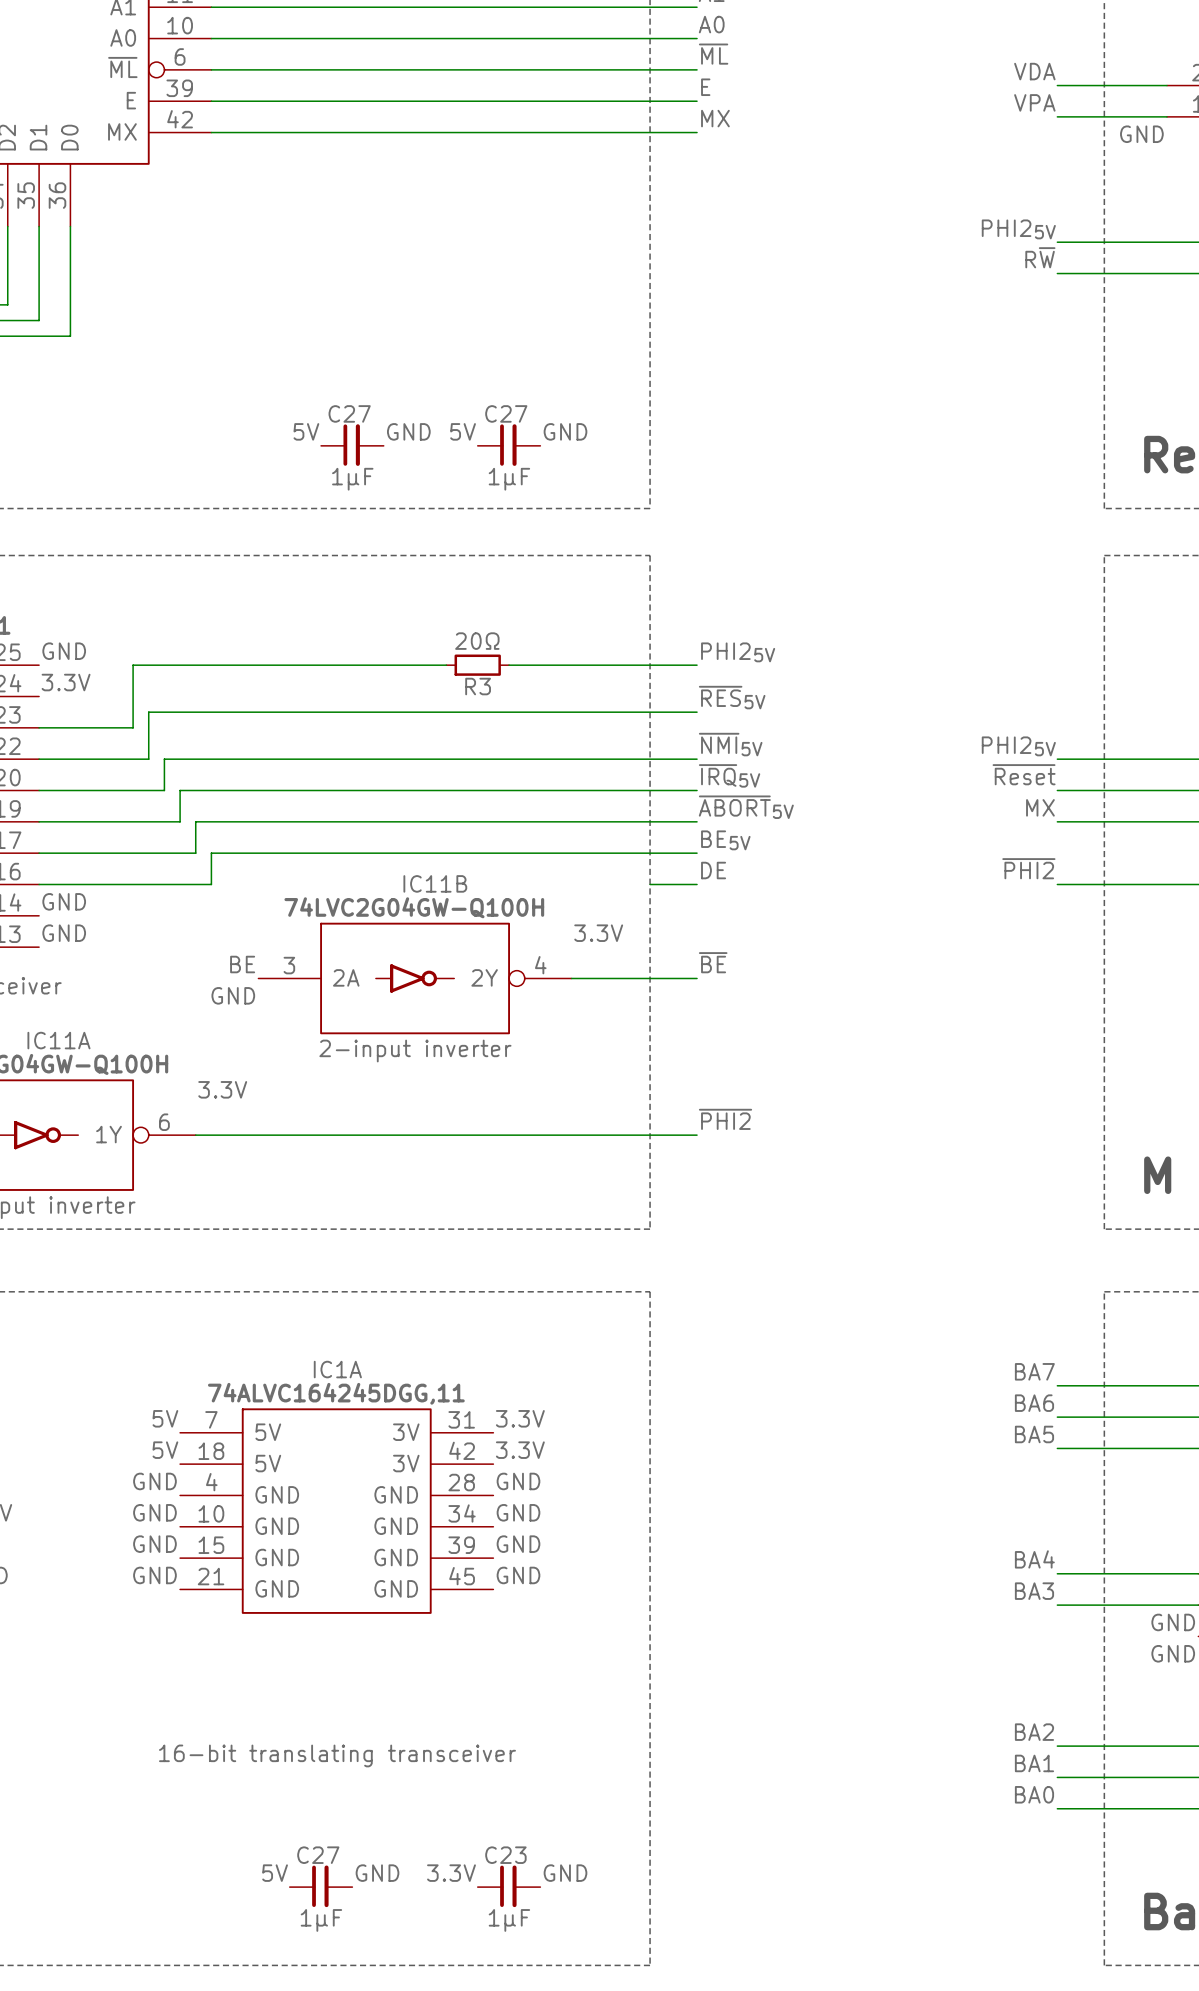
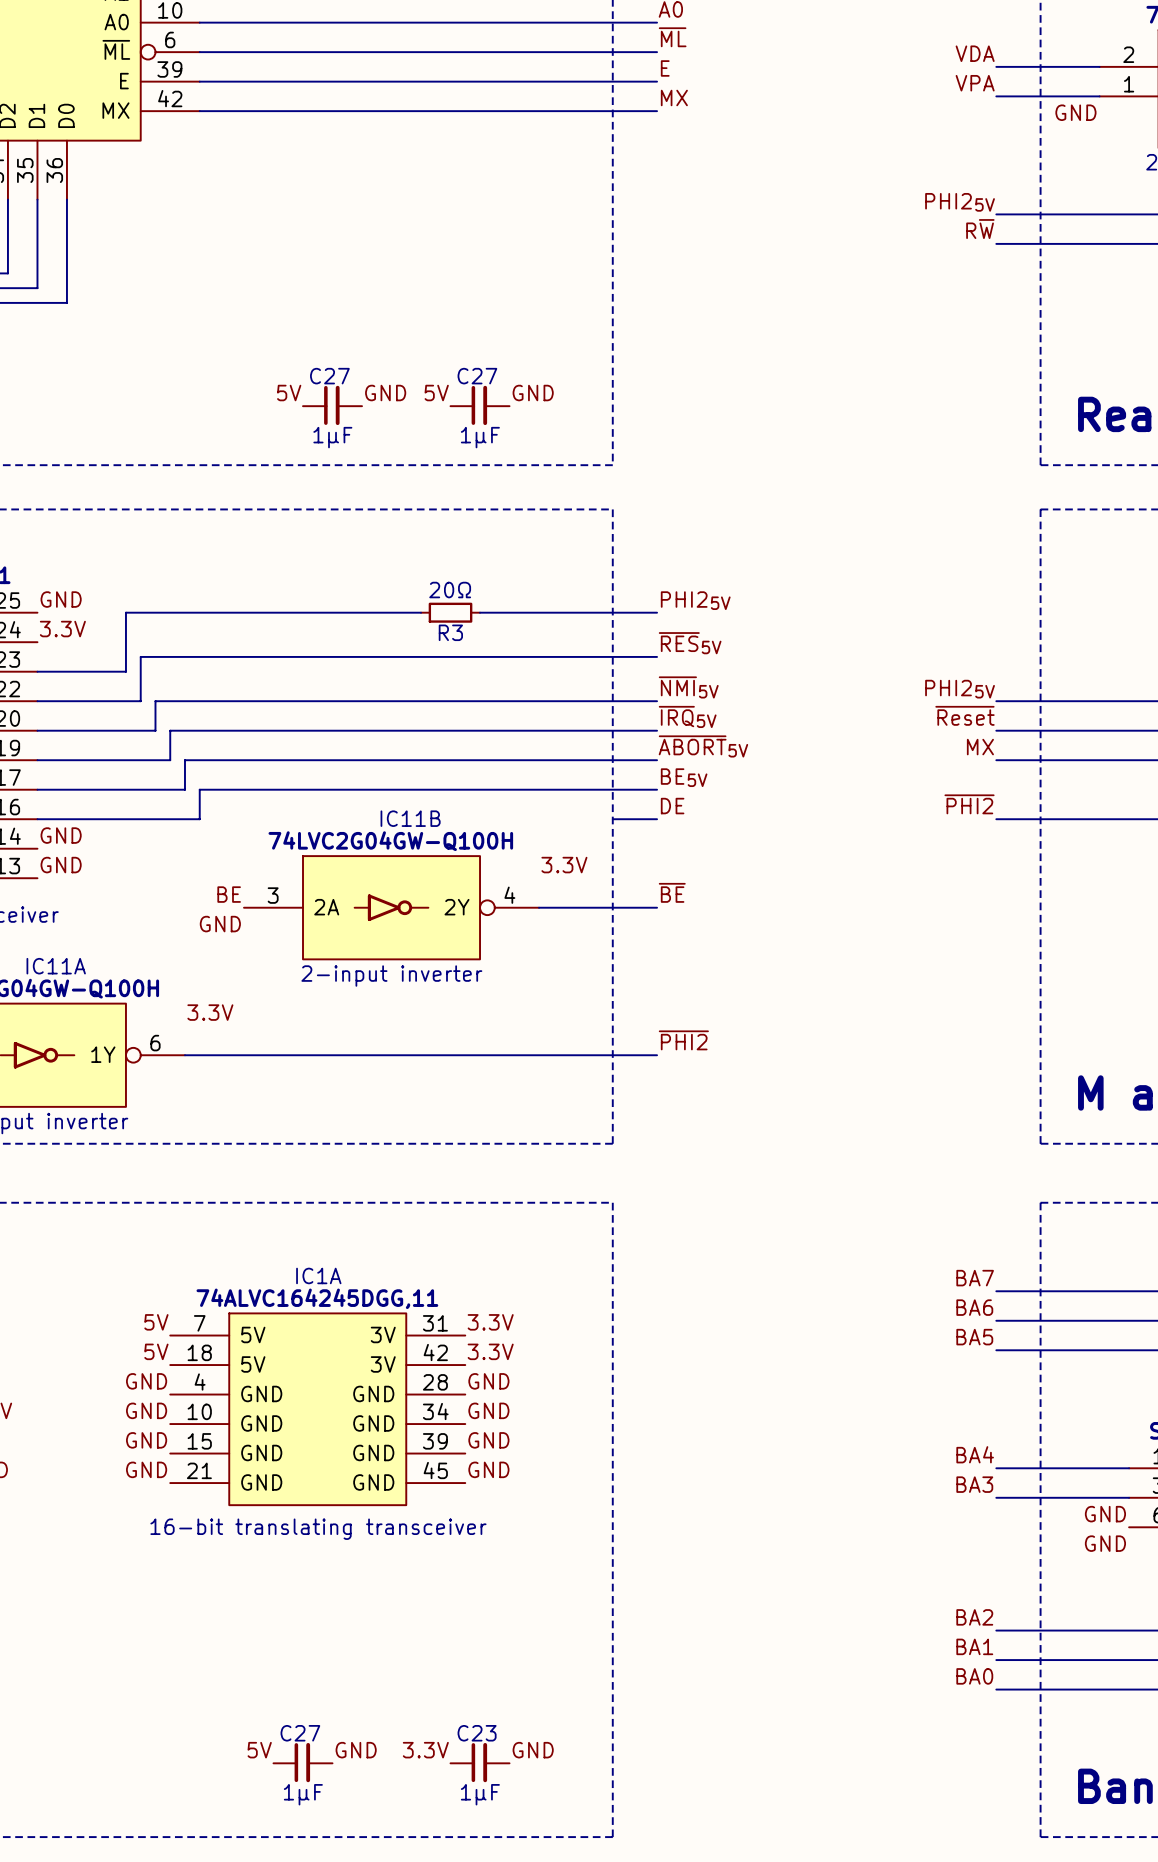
IC1A text position: 16-bit translating transceiver (337, 1755) -> 16-bit translating transceiver (318, 1529)

